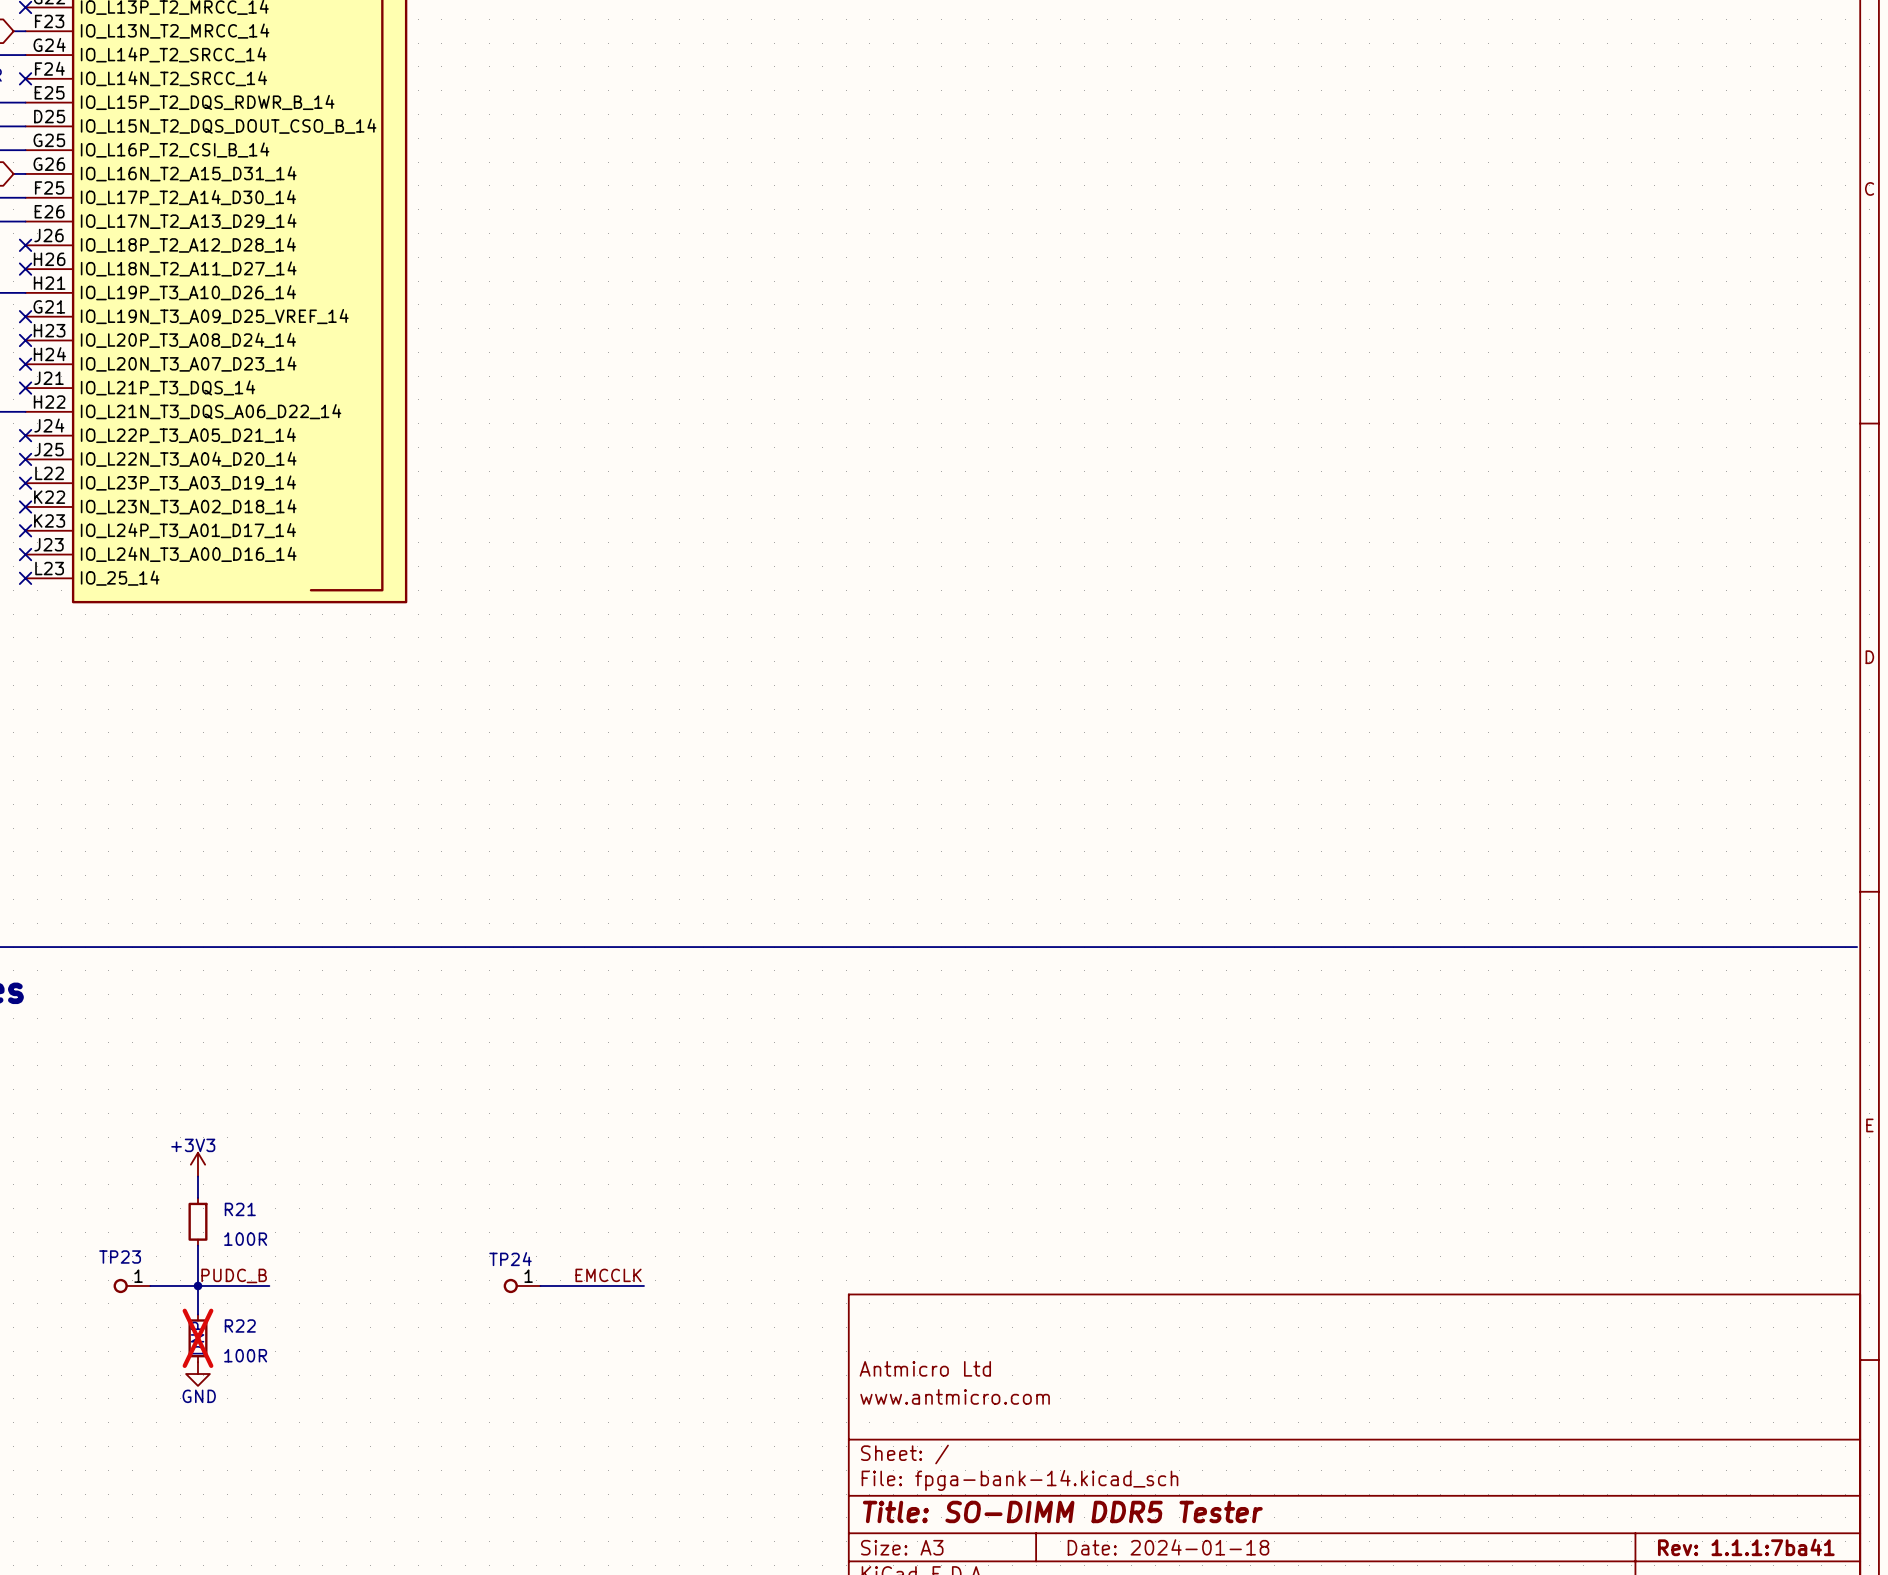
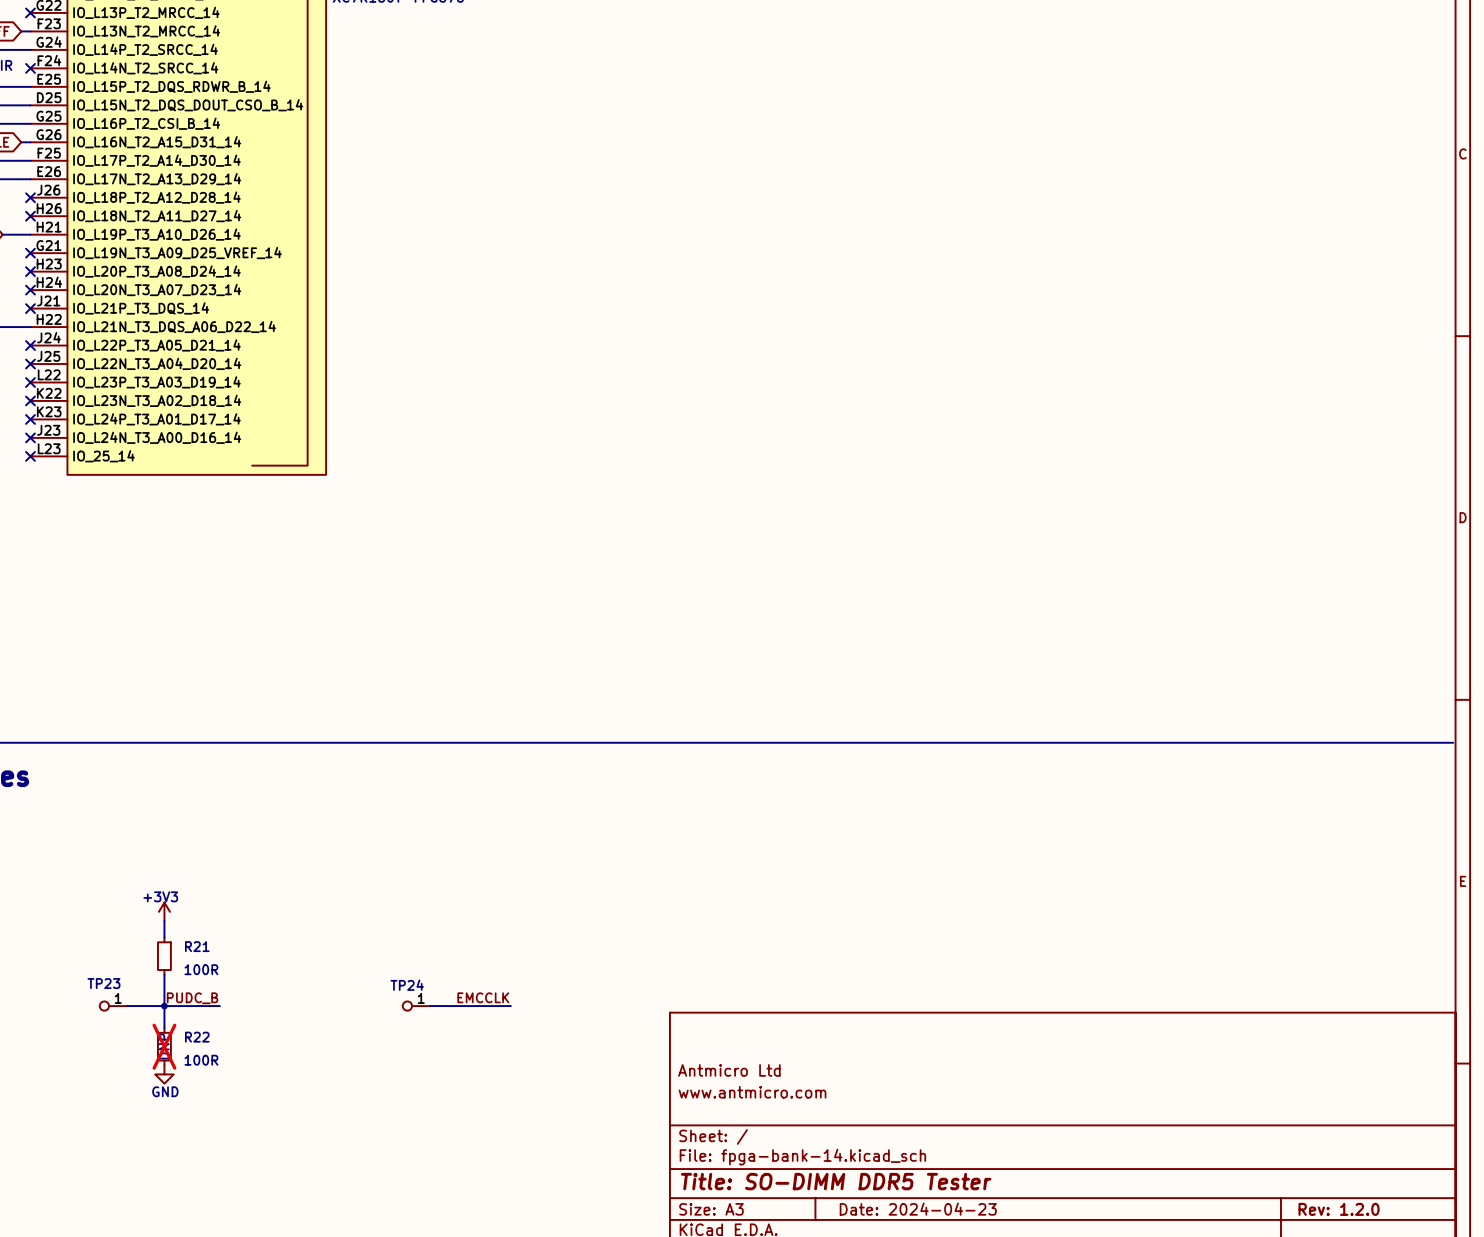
title block: Date: 2024-01-18 (1168, 1547) -> Date: 2024-04-23 (918, 1209)
title block: Rev: 1.1.1:7ba41 (1746, 1547) -> Rev: 1.2.0 (1339, 1209)

